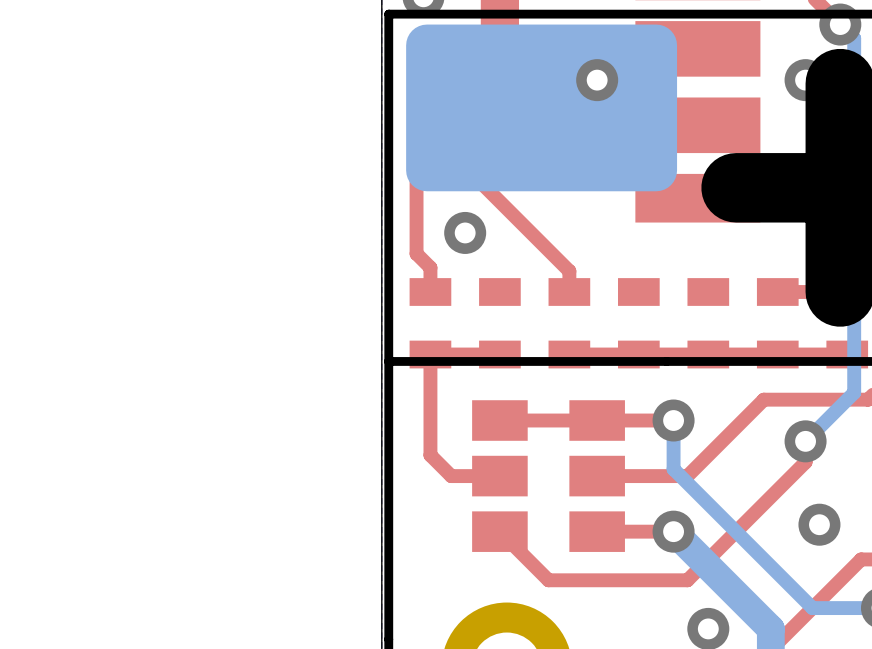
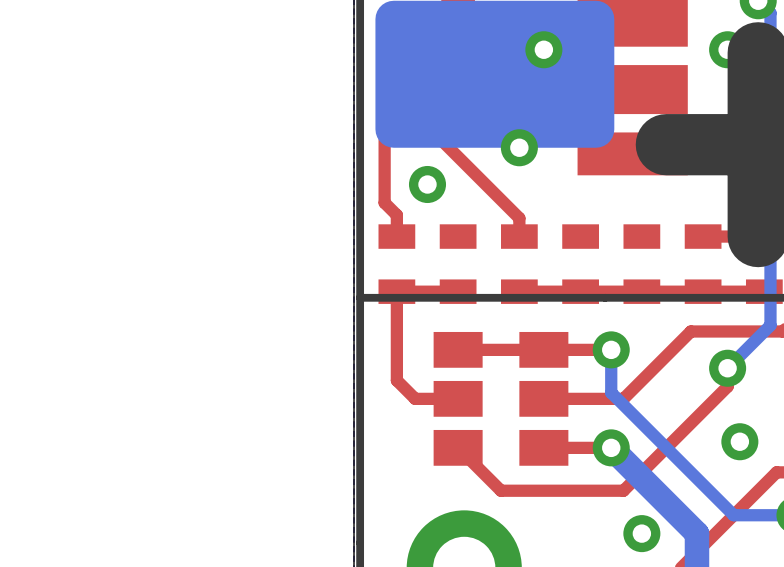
via: none -> (519, 147)

